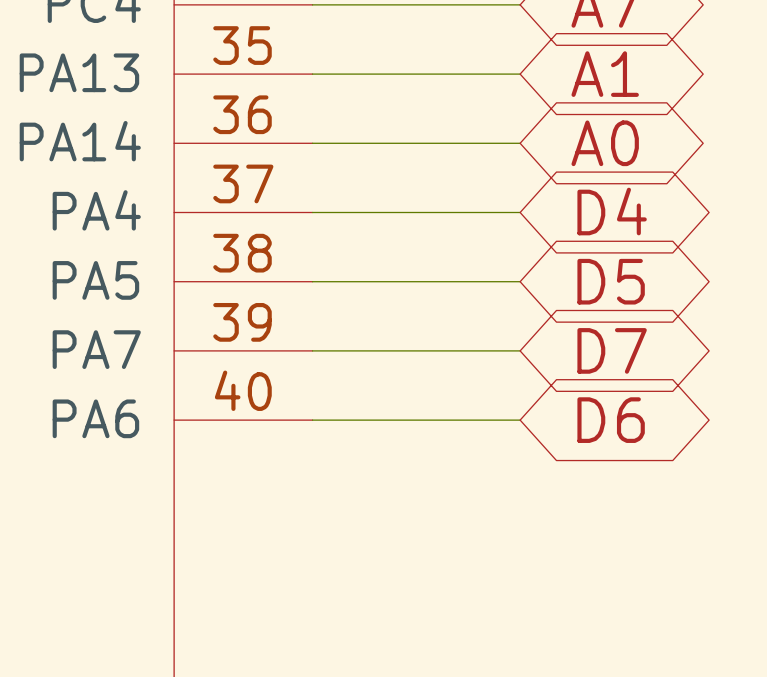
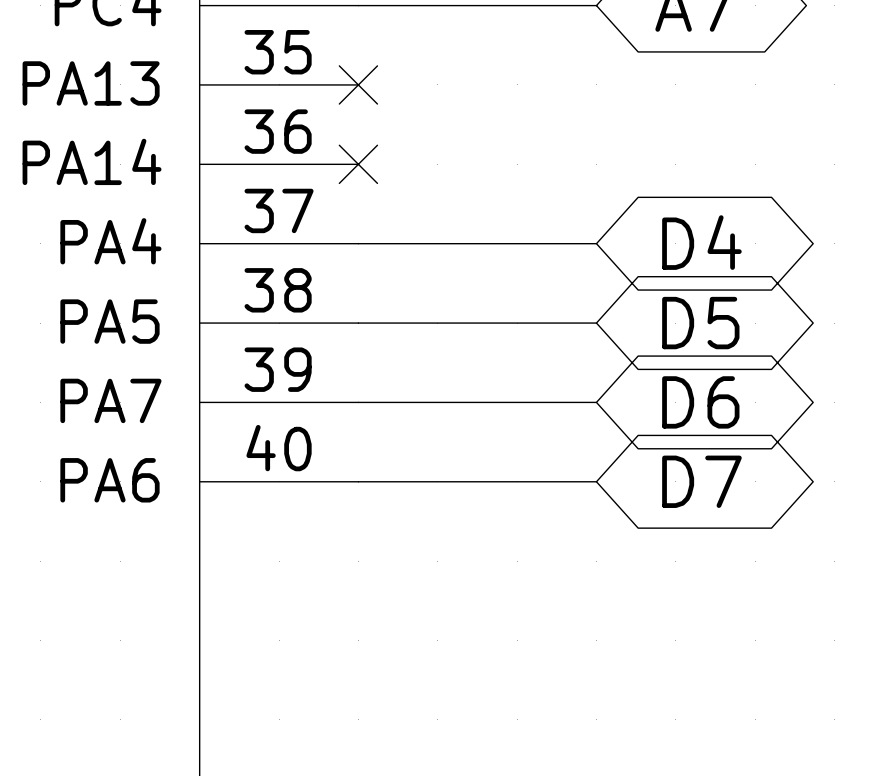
wire: (312, 74) (520, 74) -> none
no-connect mark: none -> (358, 84)
global label: A1 (605, 74) -> none
wire: (312, 143) (520, 143) -> none
no-connect mark: none -> (358, 164)
global label: A0 (605, 143) -> none
global label: D7 (612, 350) -> D6 (700, 402)
global label: D6 (611, 420) -> D7 (701, 481)

